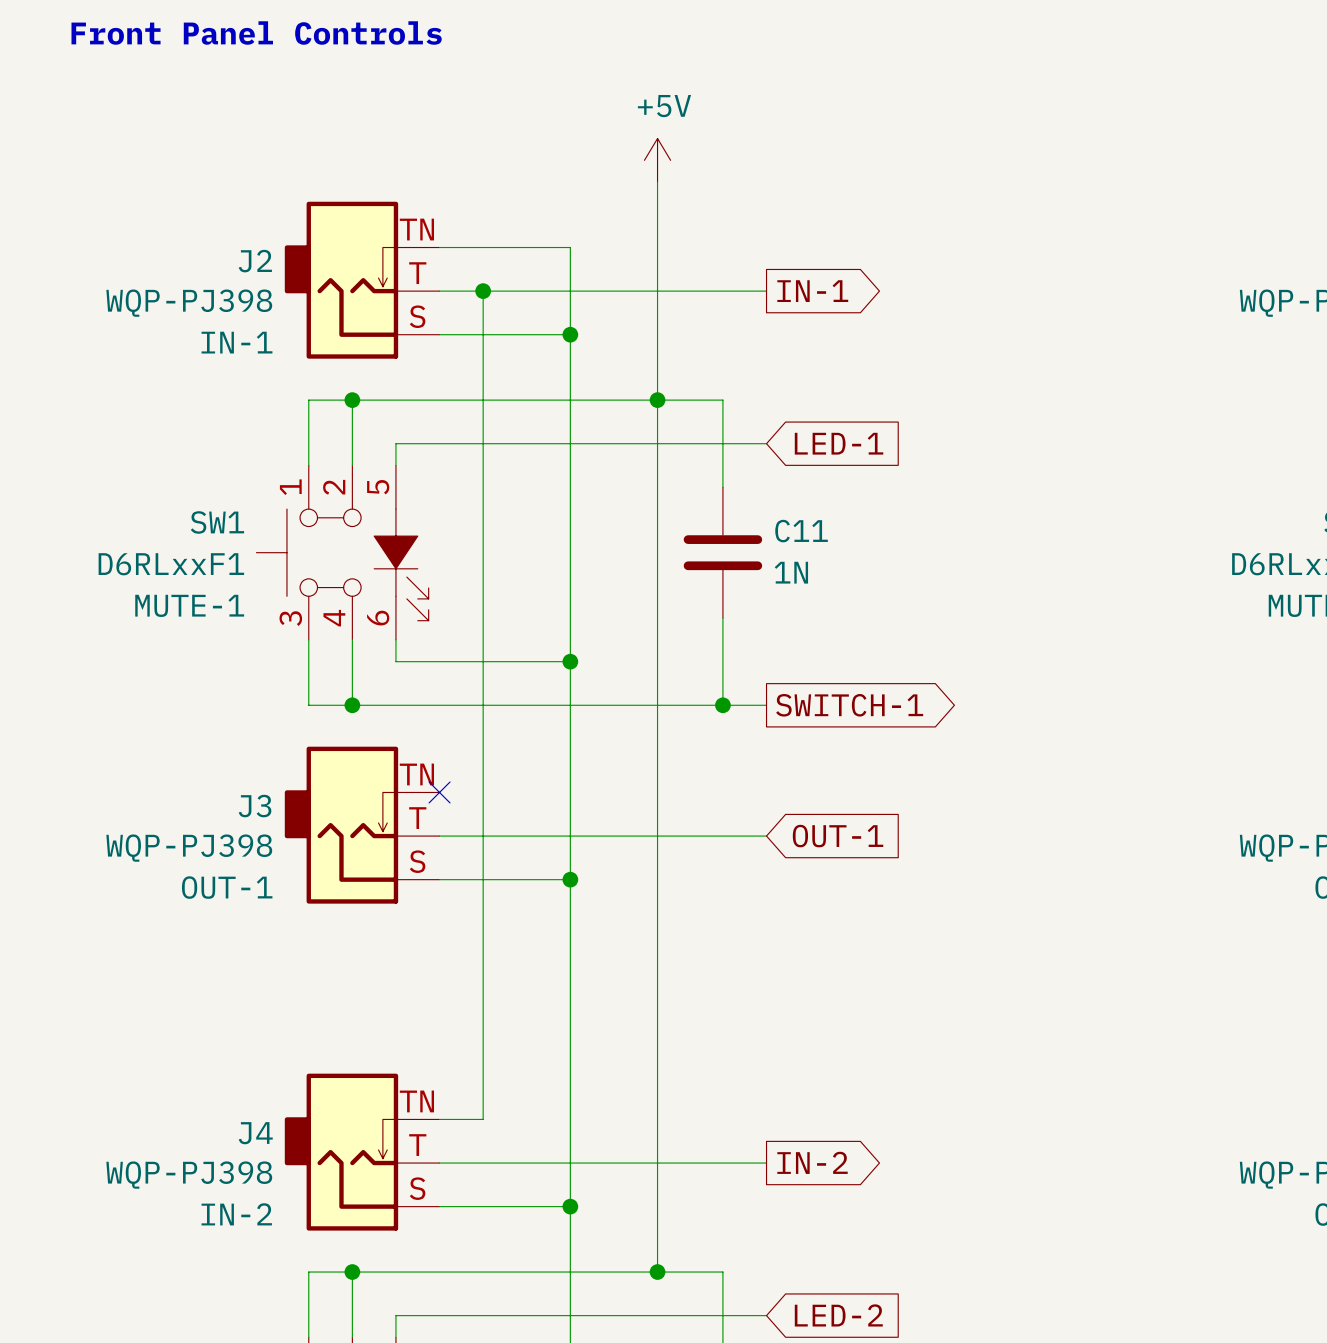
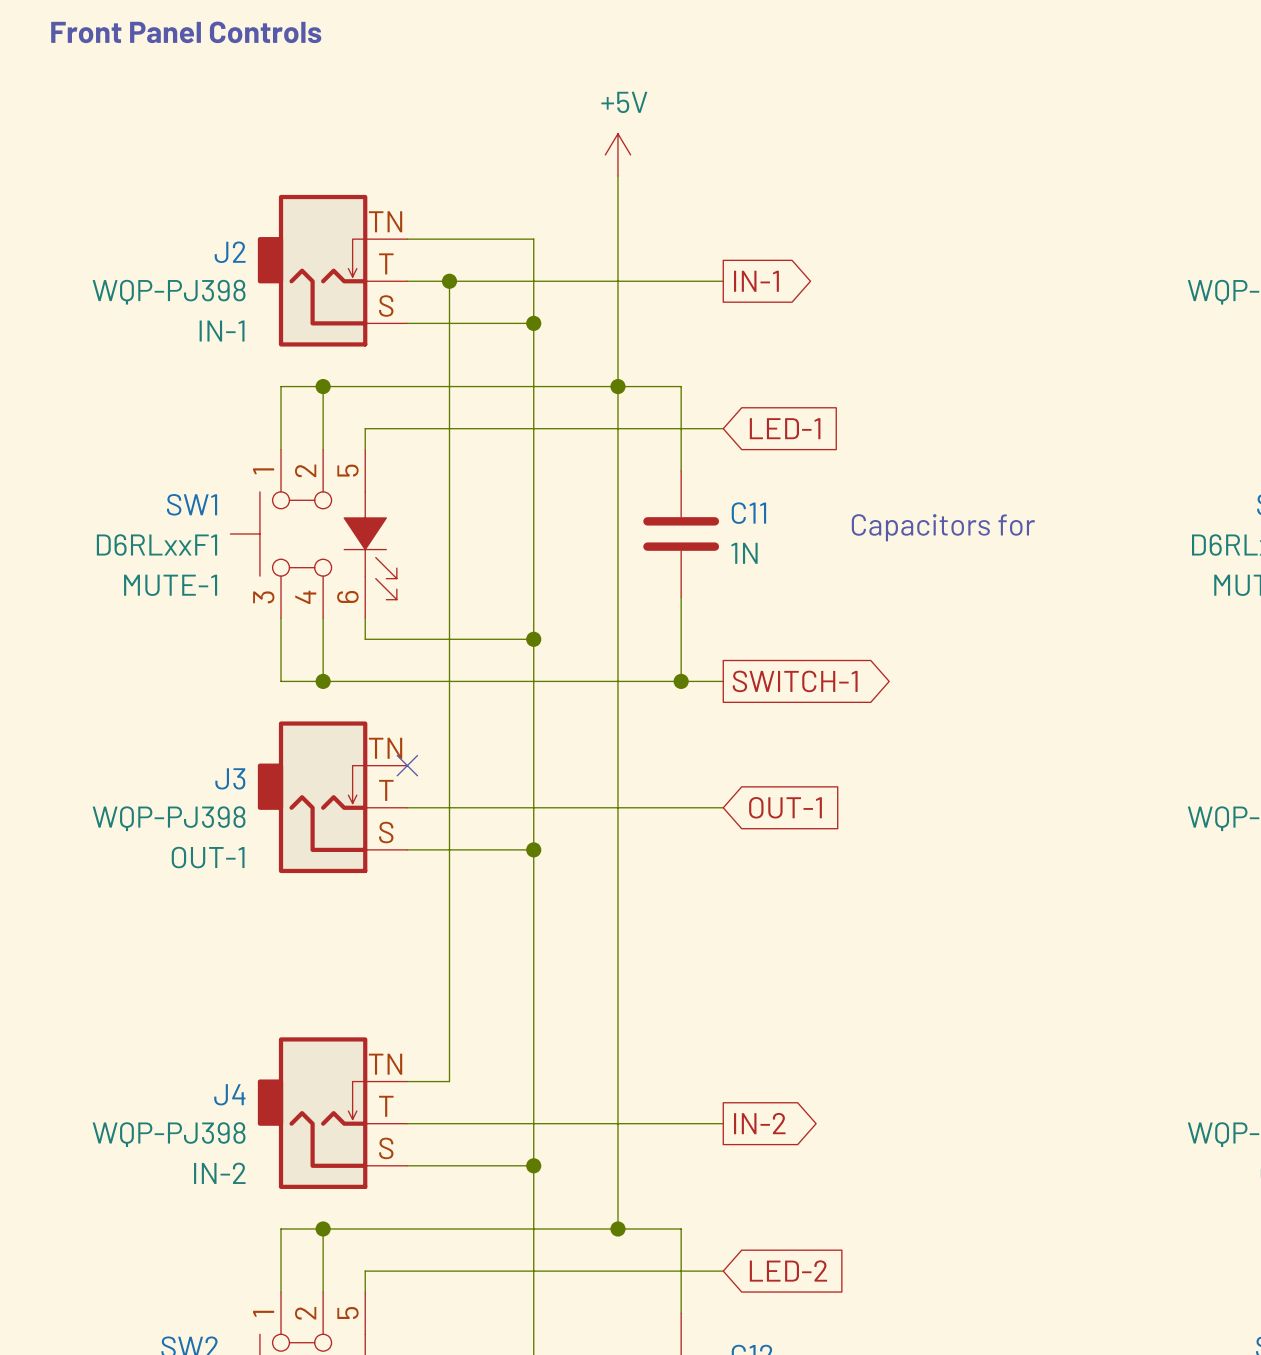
text: none -> Capacitors for (943, 527)

